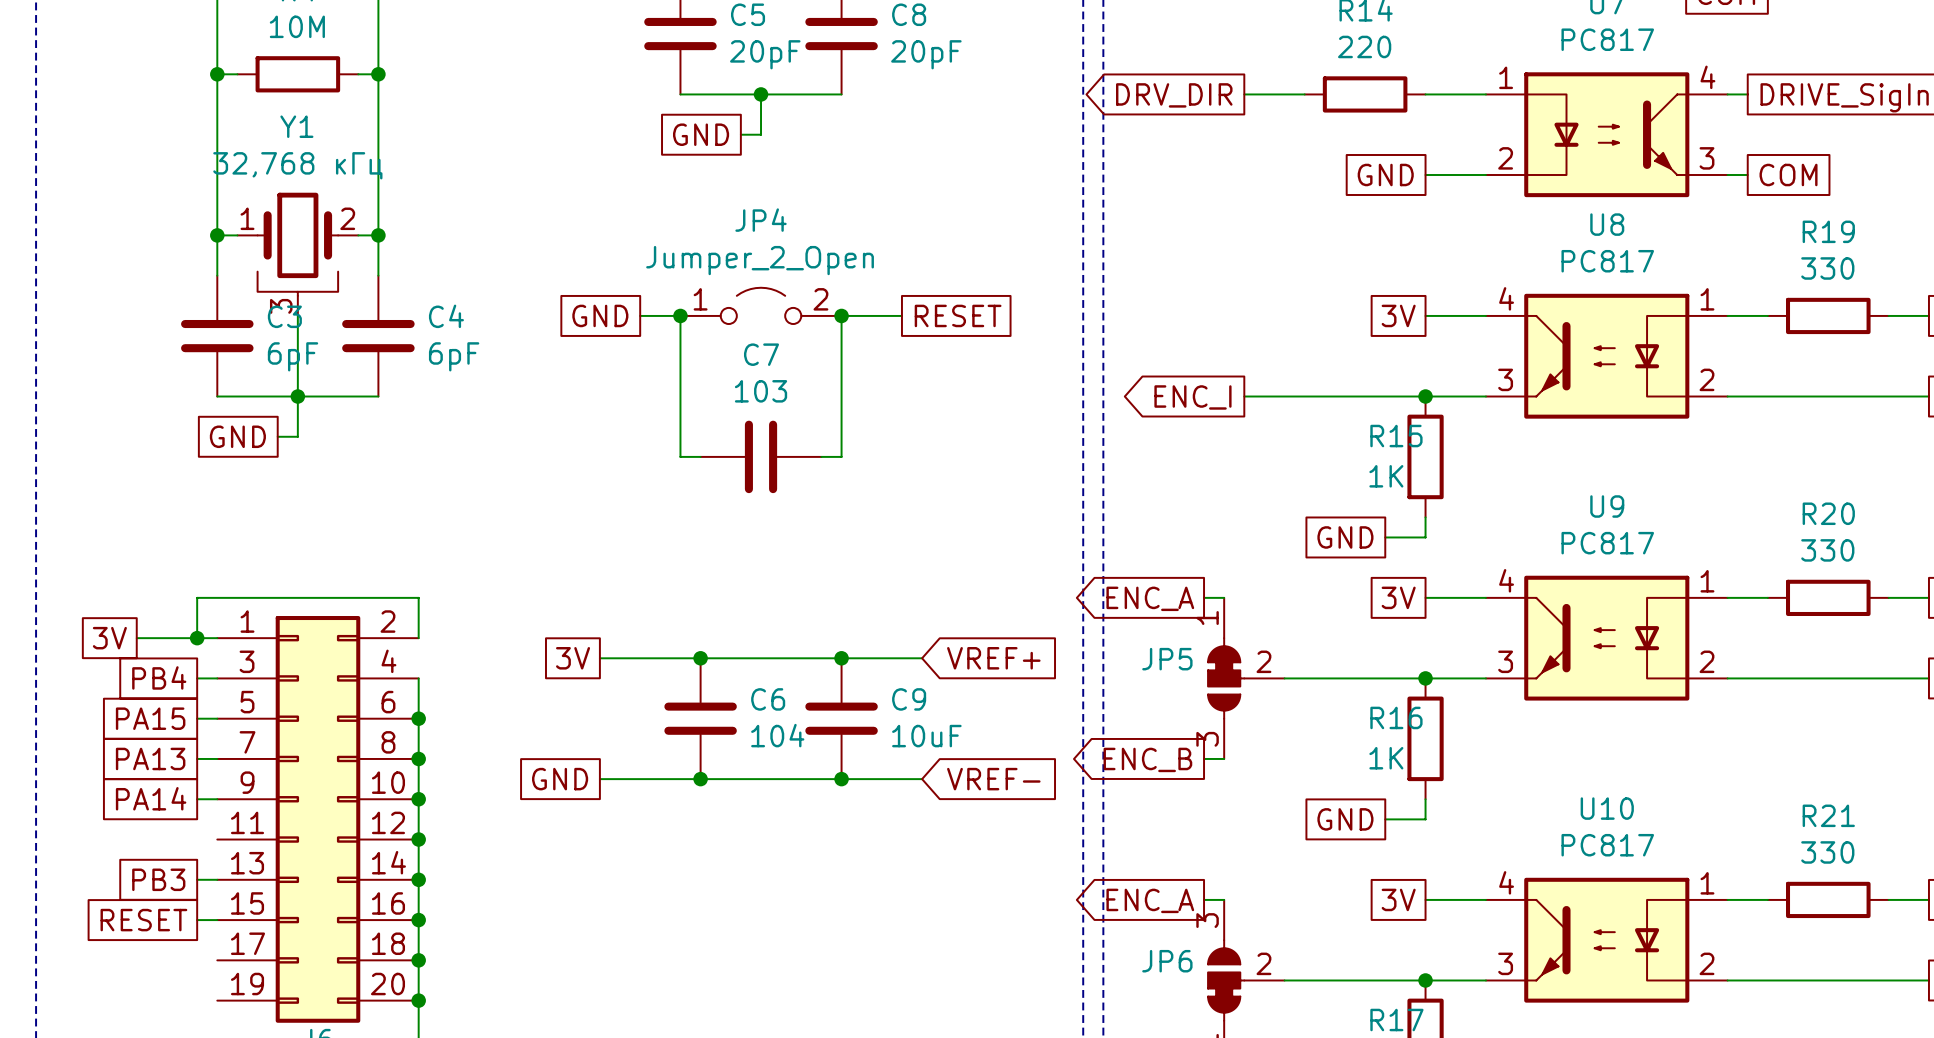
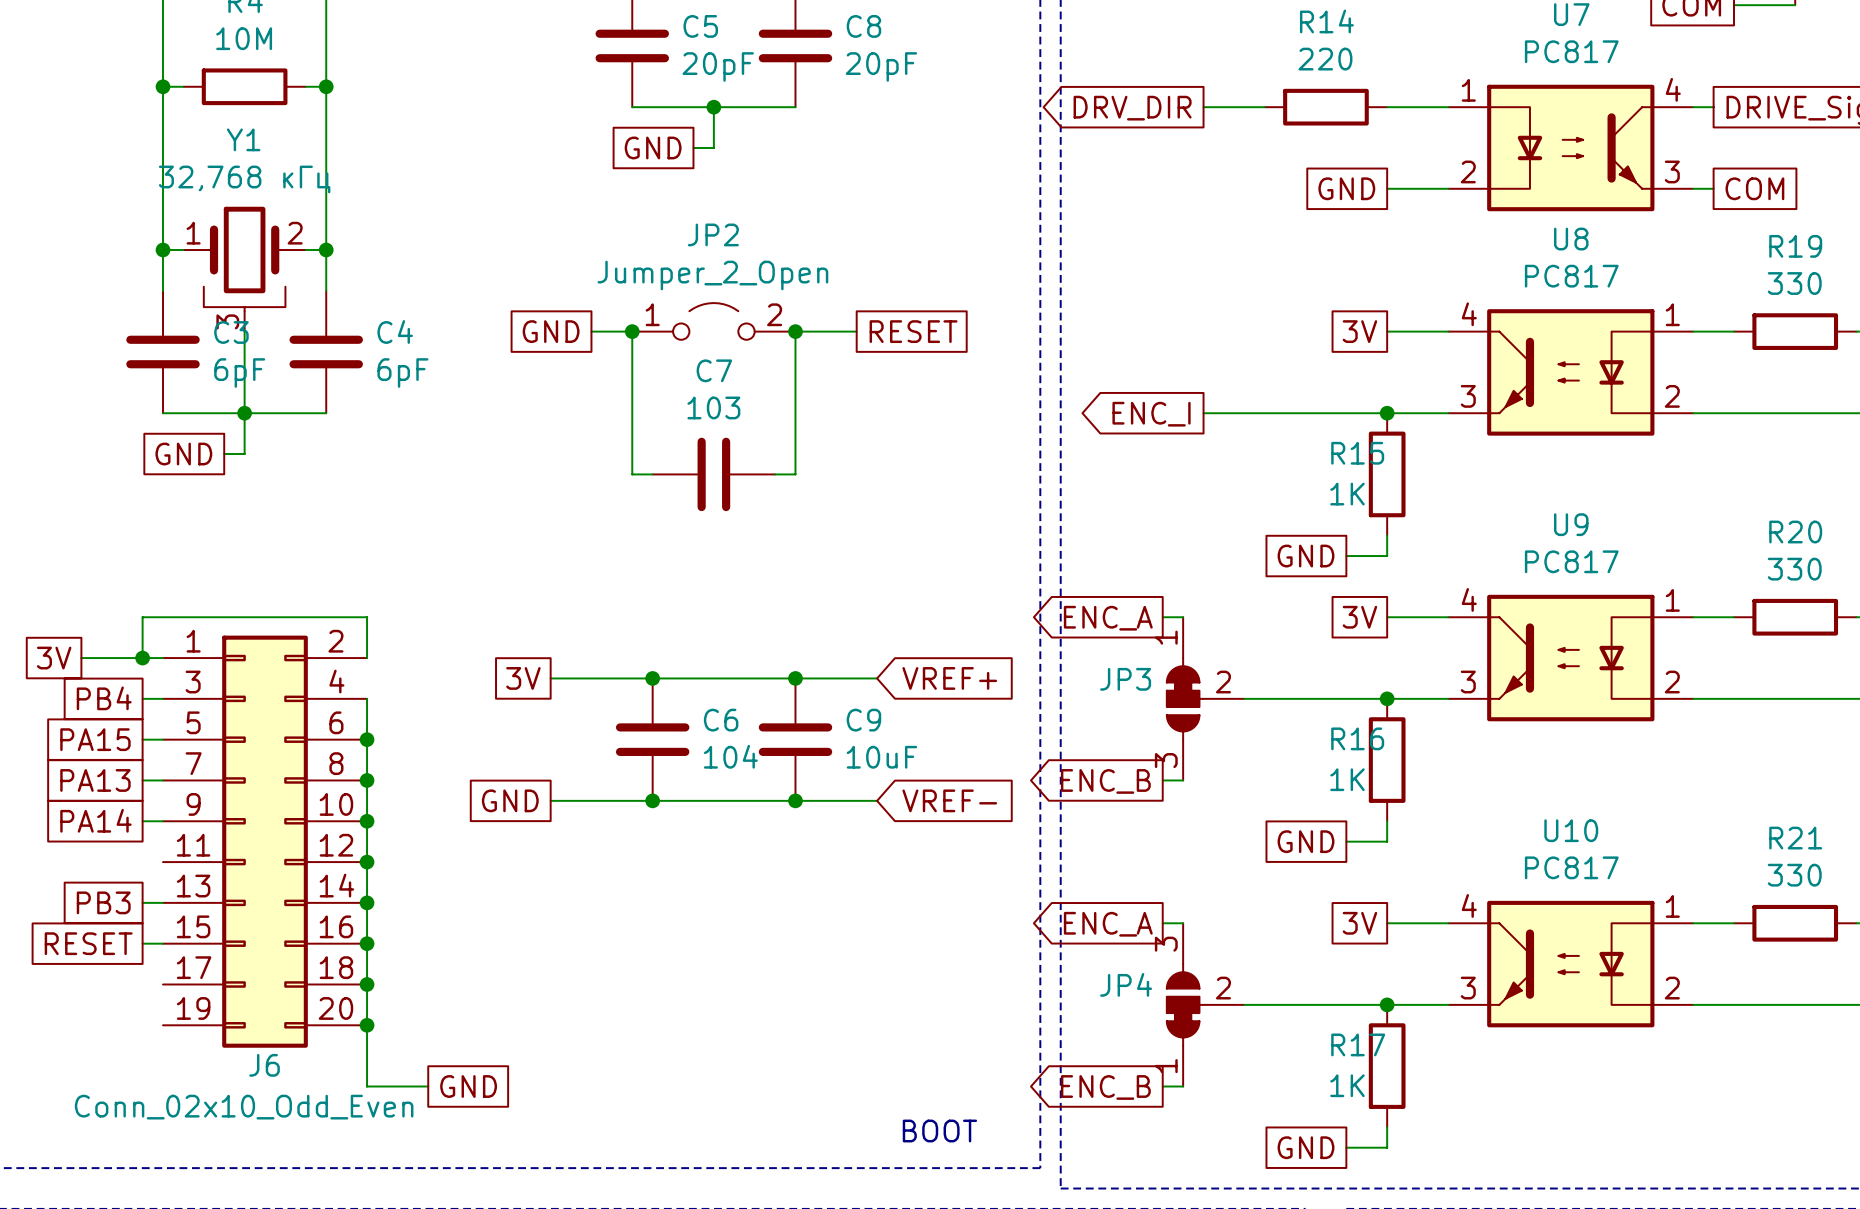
JP4 name: JP4 (761, 220) -> JP2 (713, 234)
JP5 name: JP5 (1167, 659) -> JP3 (1125, 679)
JP6 name: JP6 (1167, 961) -> JP4 (1126, 984)

